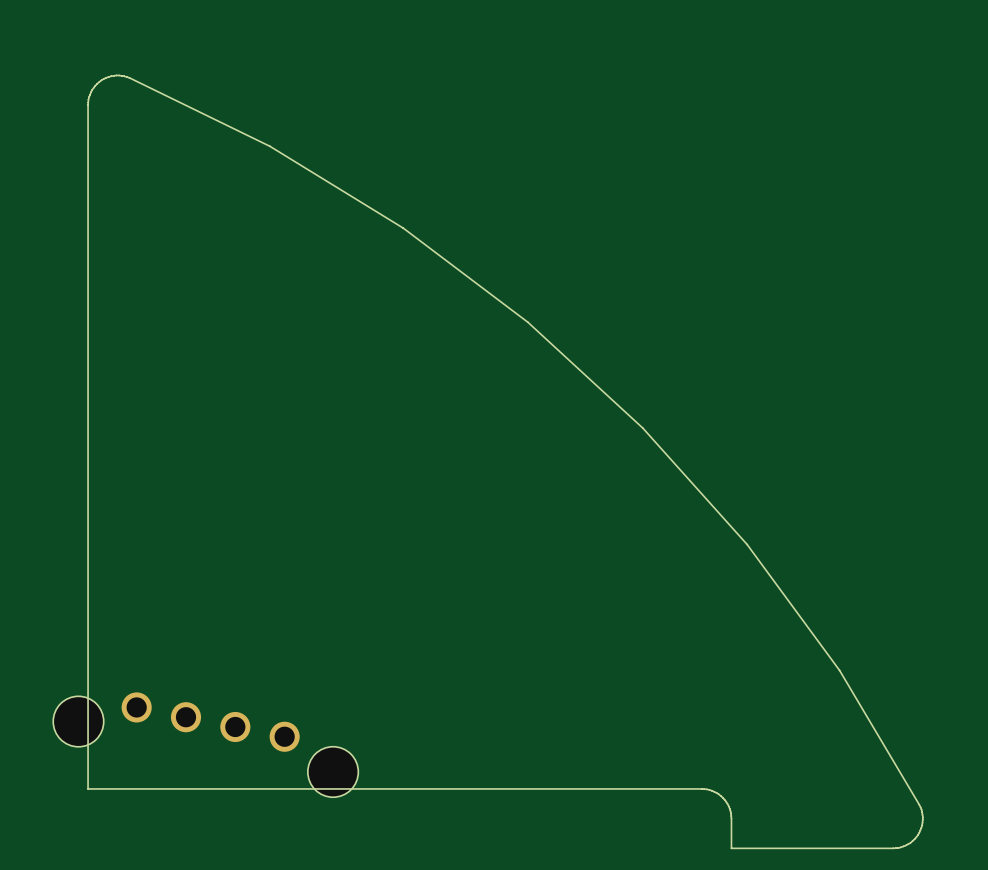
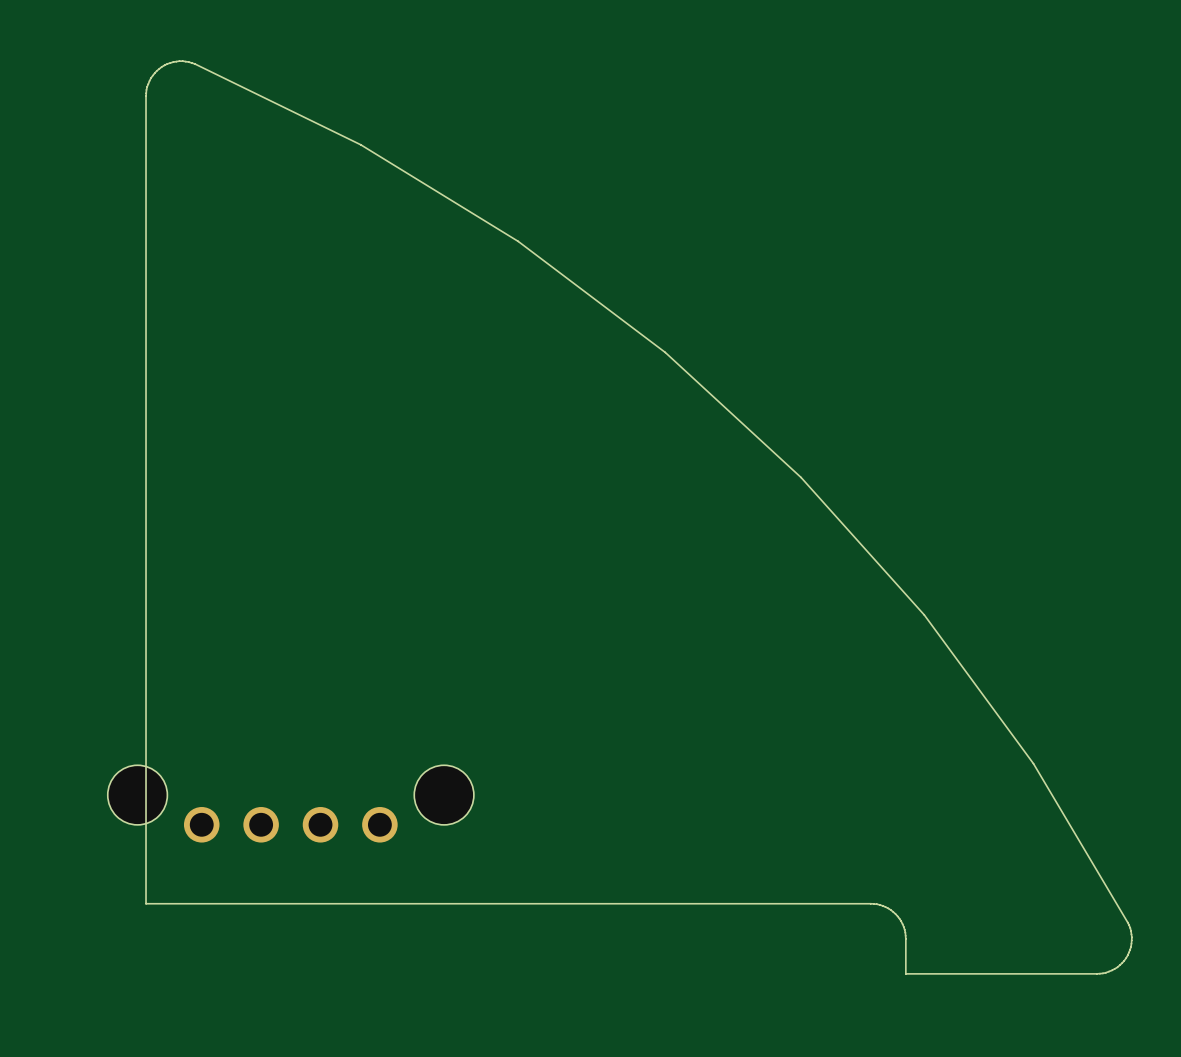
part: none -> (290, 803)
part: (205, 744) -> none

